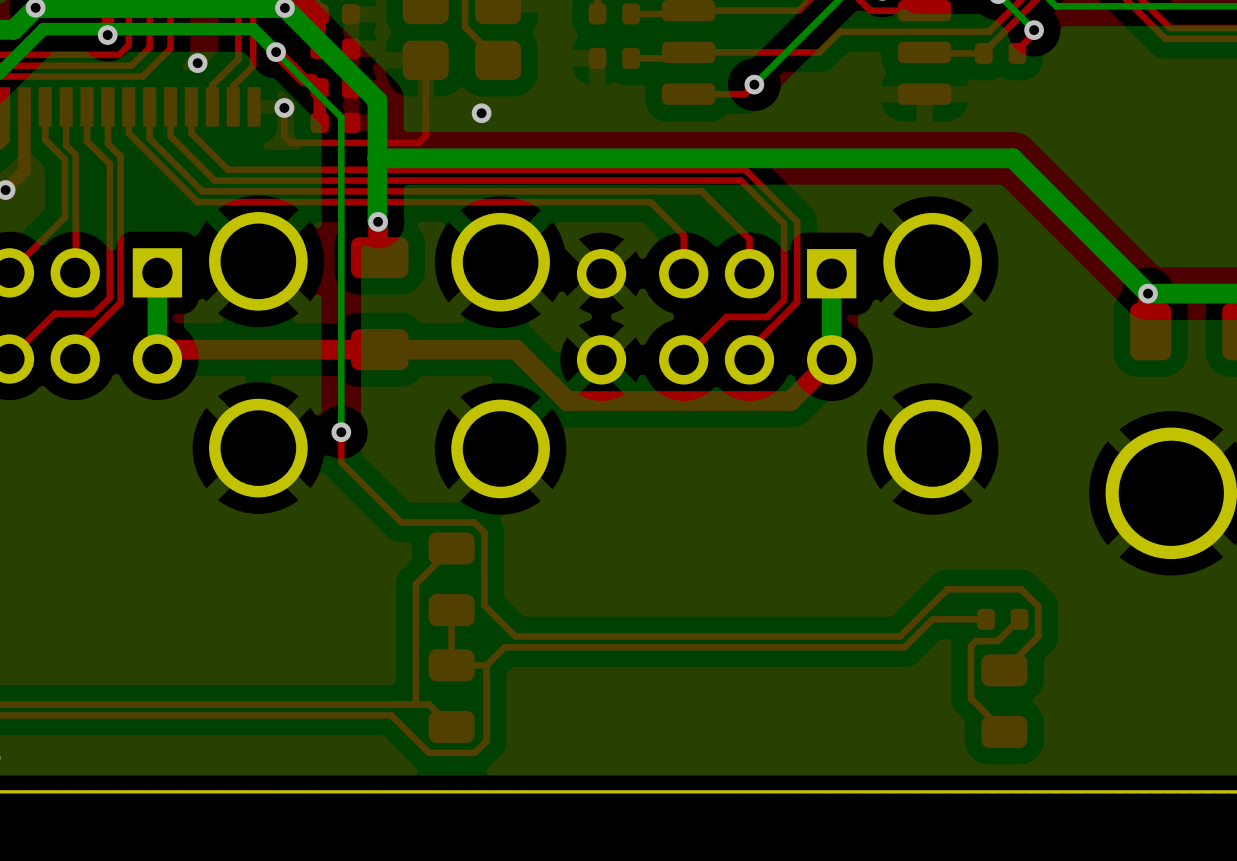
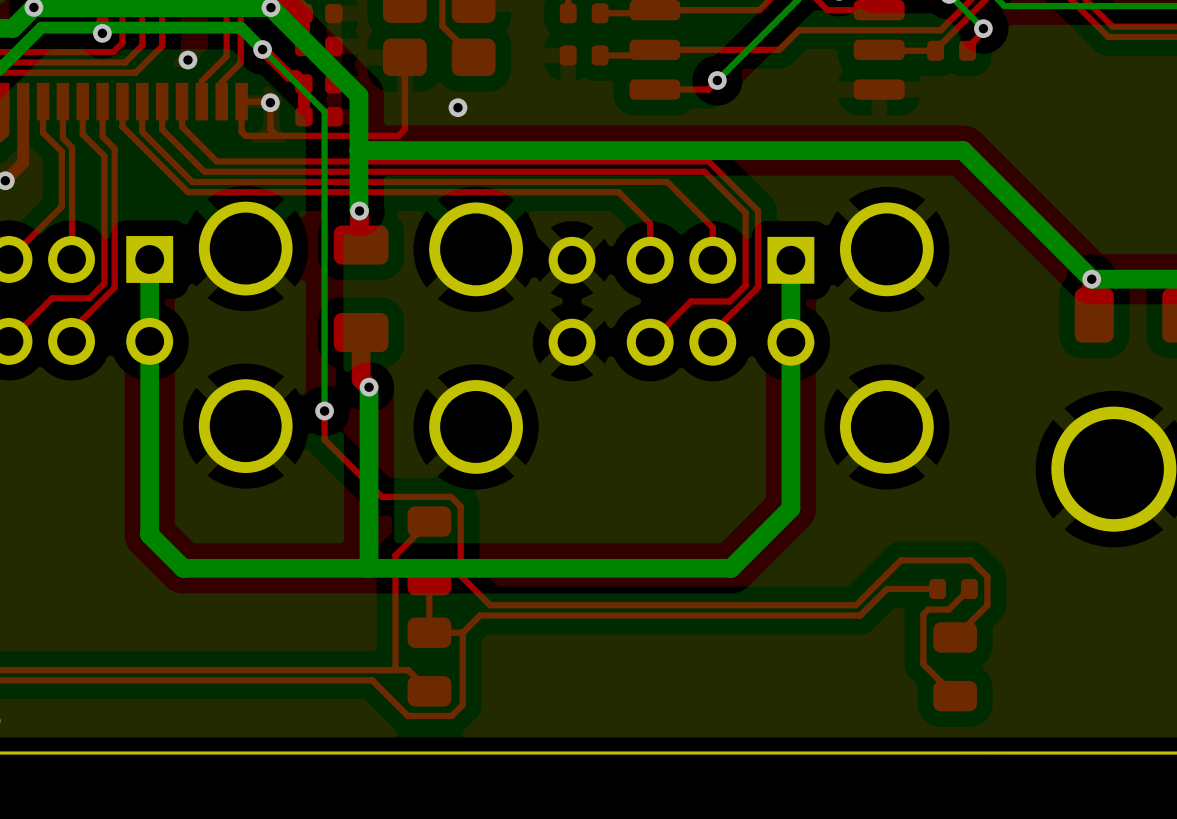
top track: none -> (270, 102) (241, 101) (241, 131) (245, 135) (277, 135)
top track: (166, 349) (515, 349) (567, 400) (790, 400) (831, 359) -> none
top track: none -> (361, 332) (361, 379) (369, 387)
bottom track: none -> (149, 341) (149, 534) (183, 568) (731, 568) (790, 508) (790, 342)
bottom track: none -> (369, 387) (369, 568)
via: none -> (369, 387)

